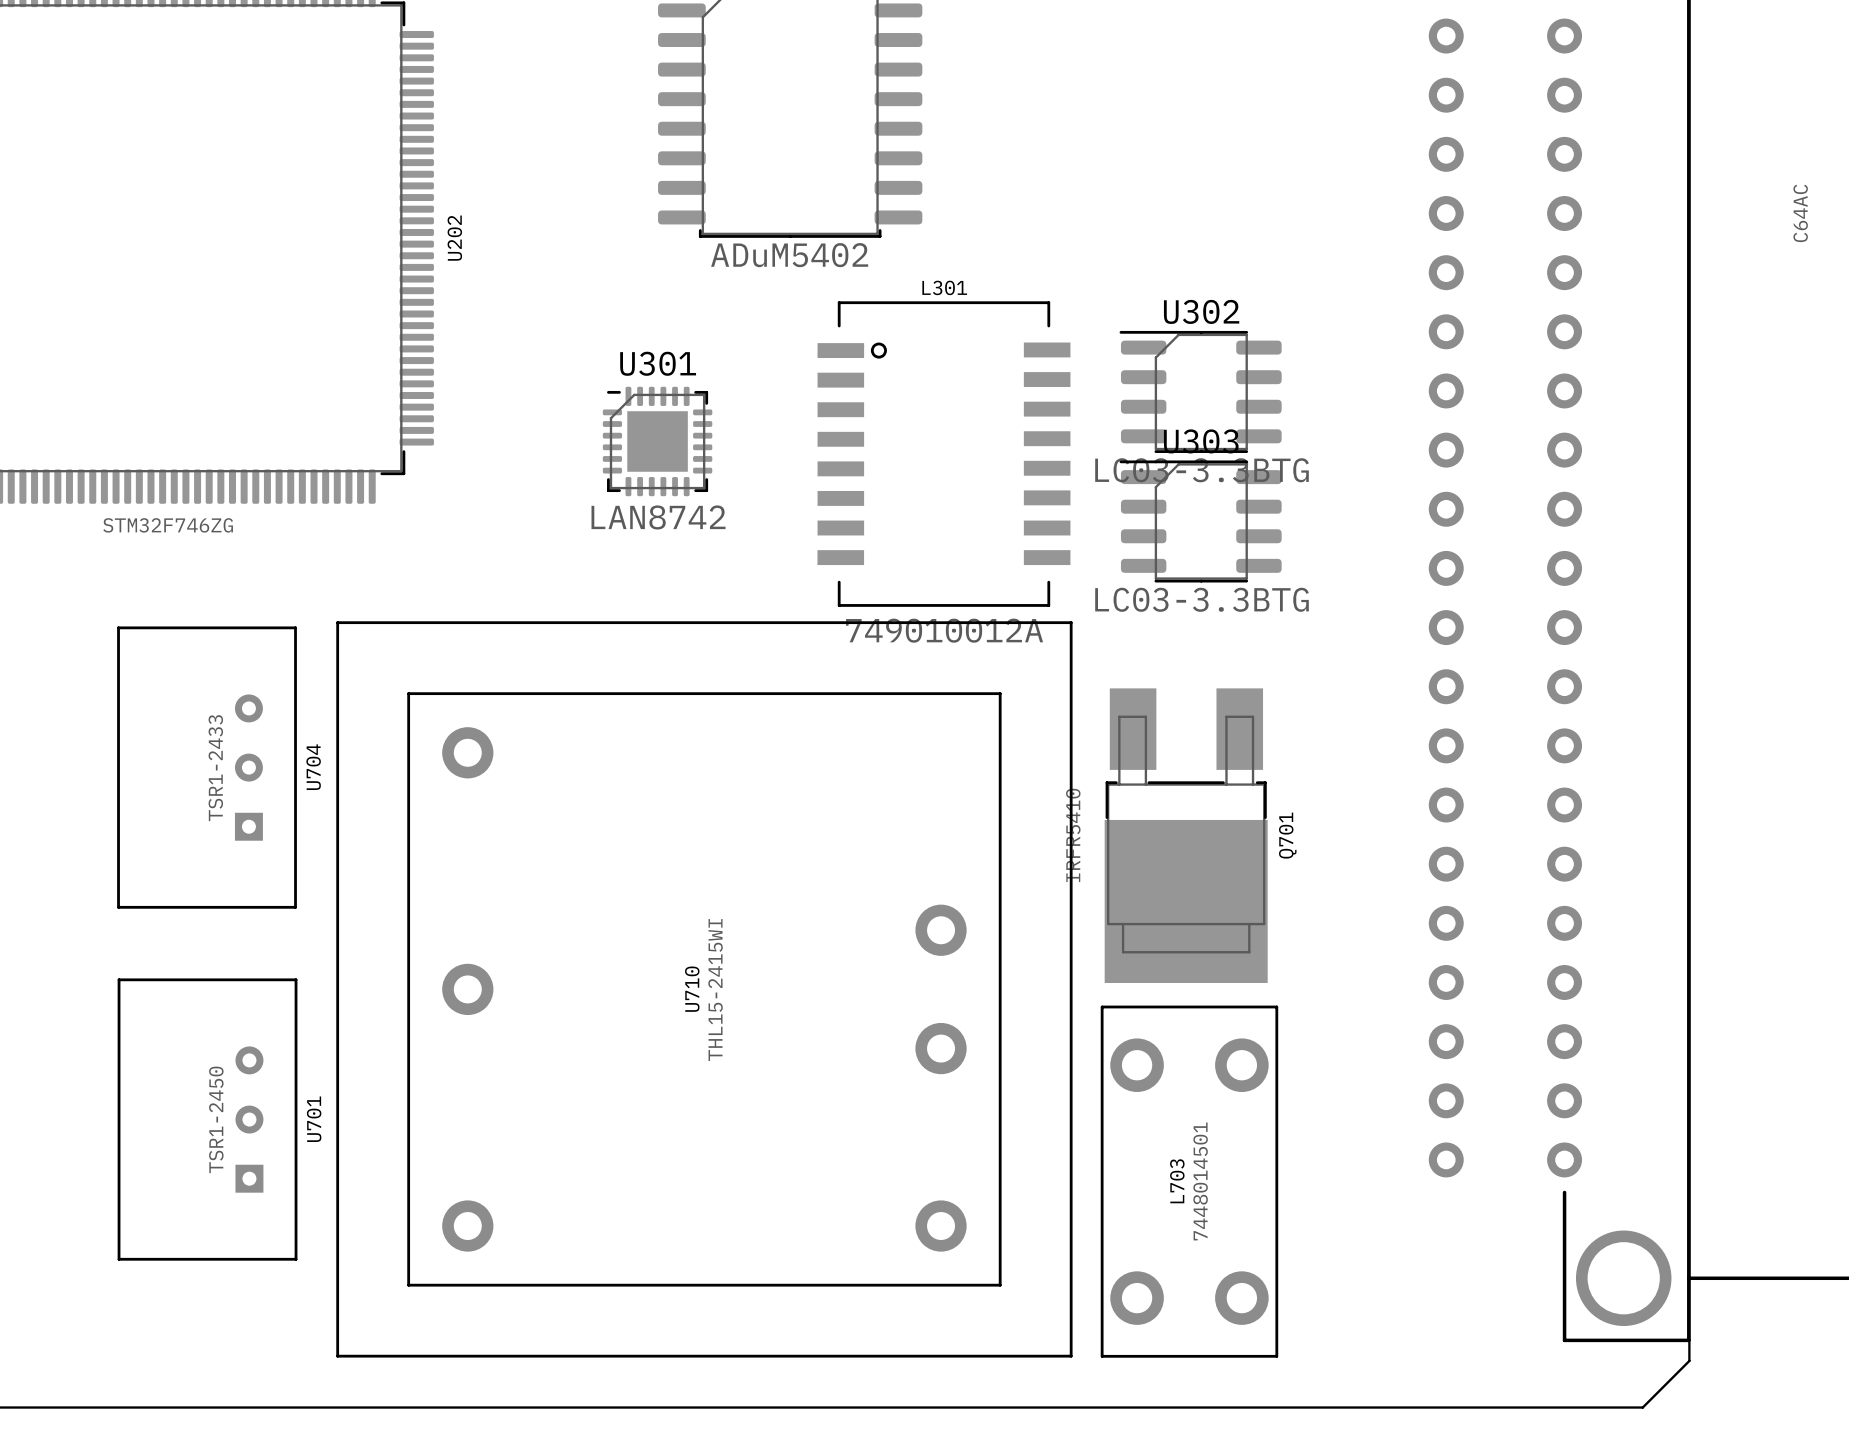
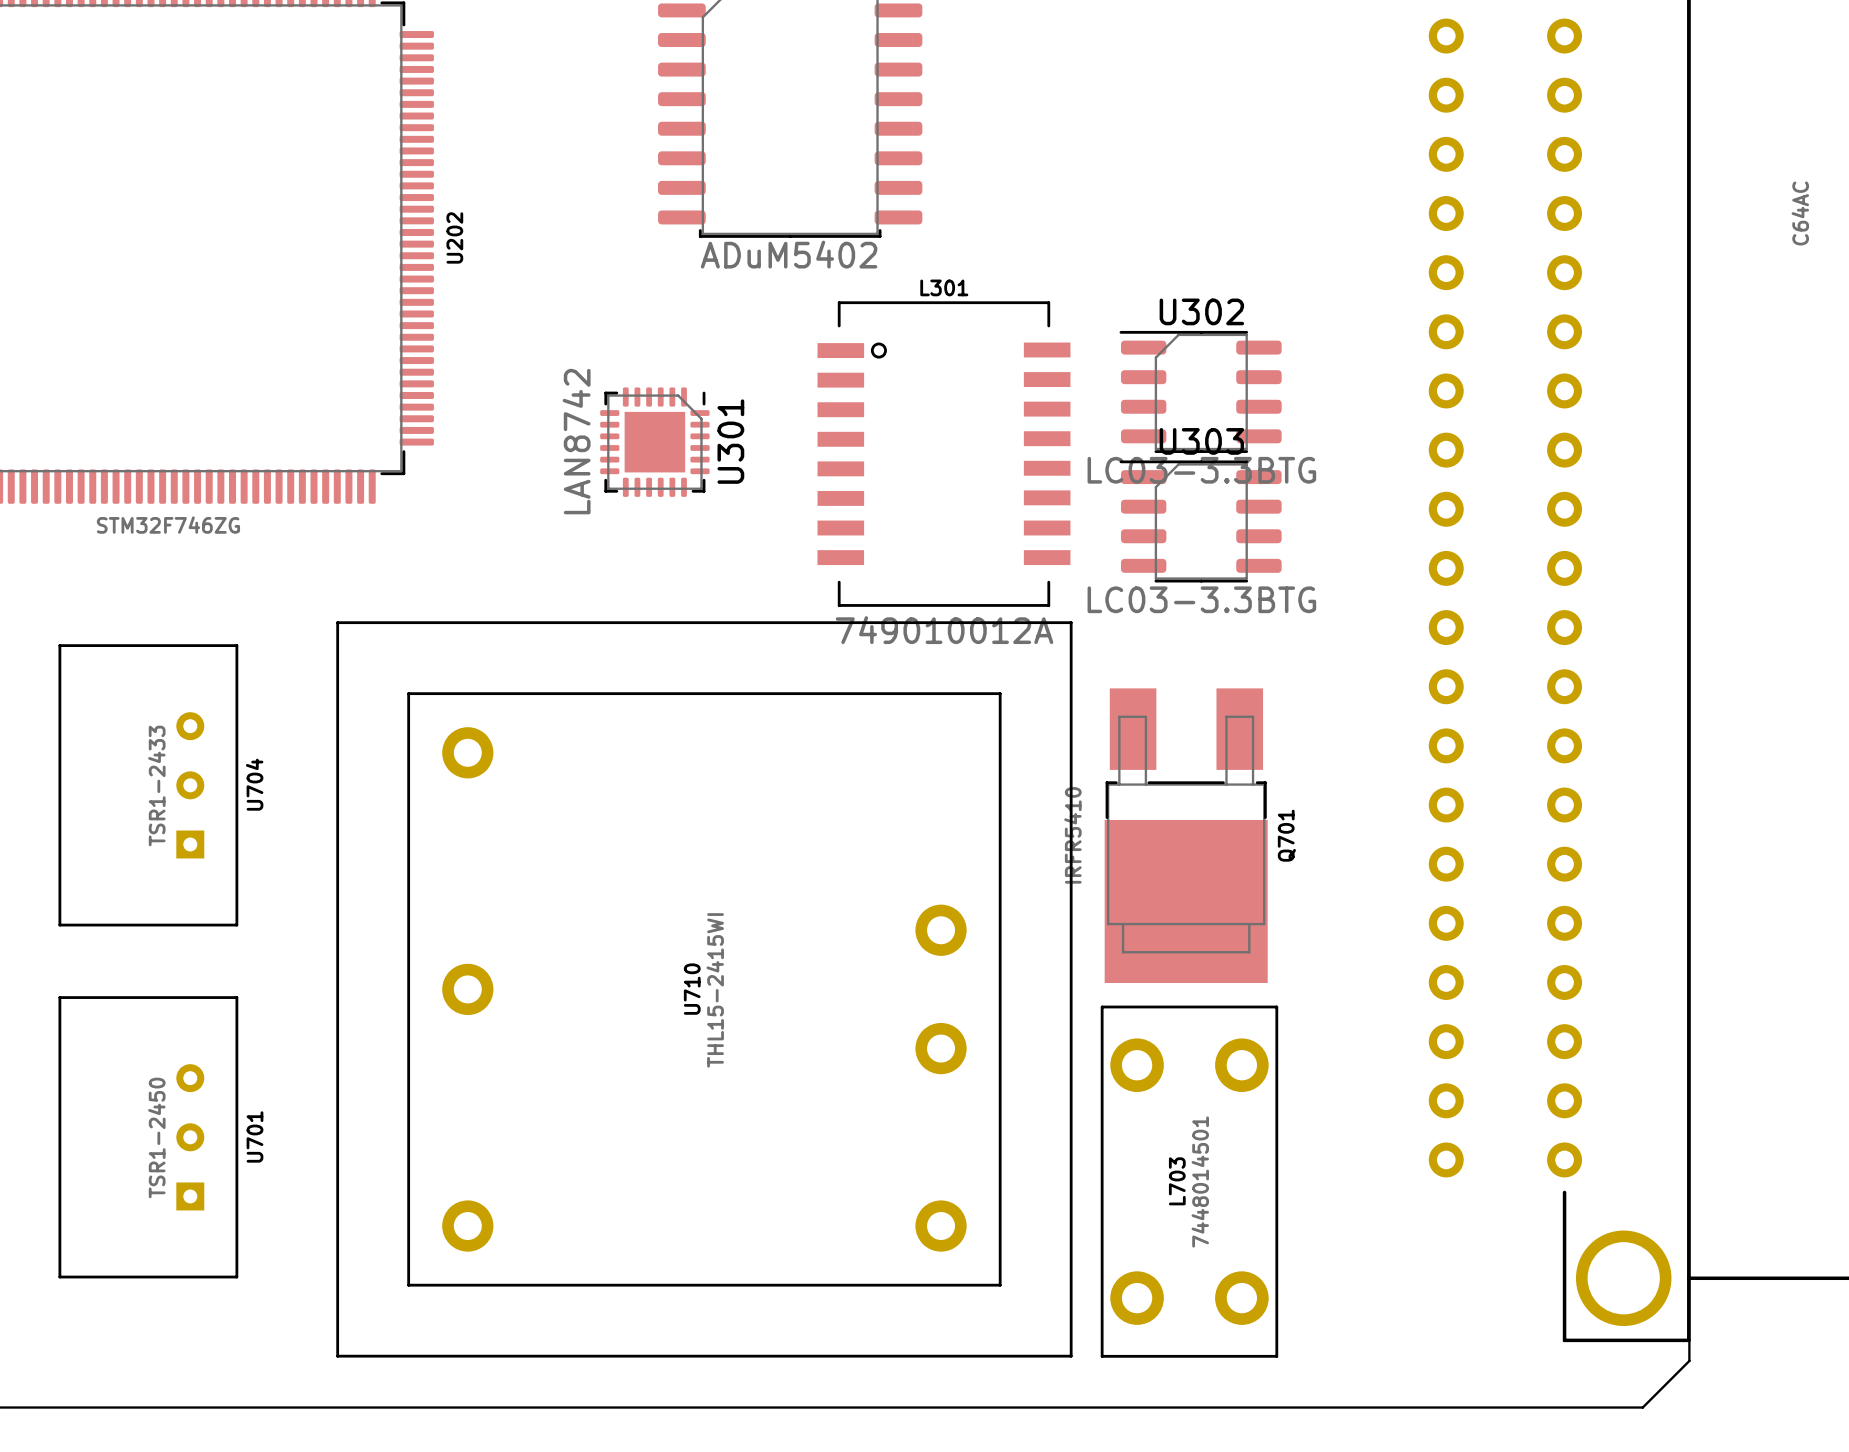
U301 rotation: 0° (657, 441) -> 90° clockwise (654, 442)
U704 position: (207, 767) -> (148, 785)
U701 position: (207, 1119) -> (148, 1137)

